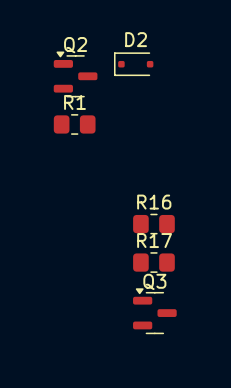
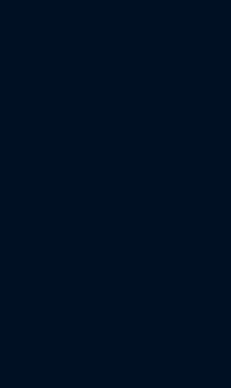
D2: (133, 64) -> none
Q2: (75, 74) -> none
R1: (74, 124) -> none
R16: (153, 224) -> none
R17: (153, 262) -> none
Q3: (154, 311) -> none

